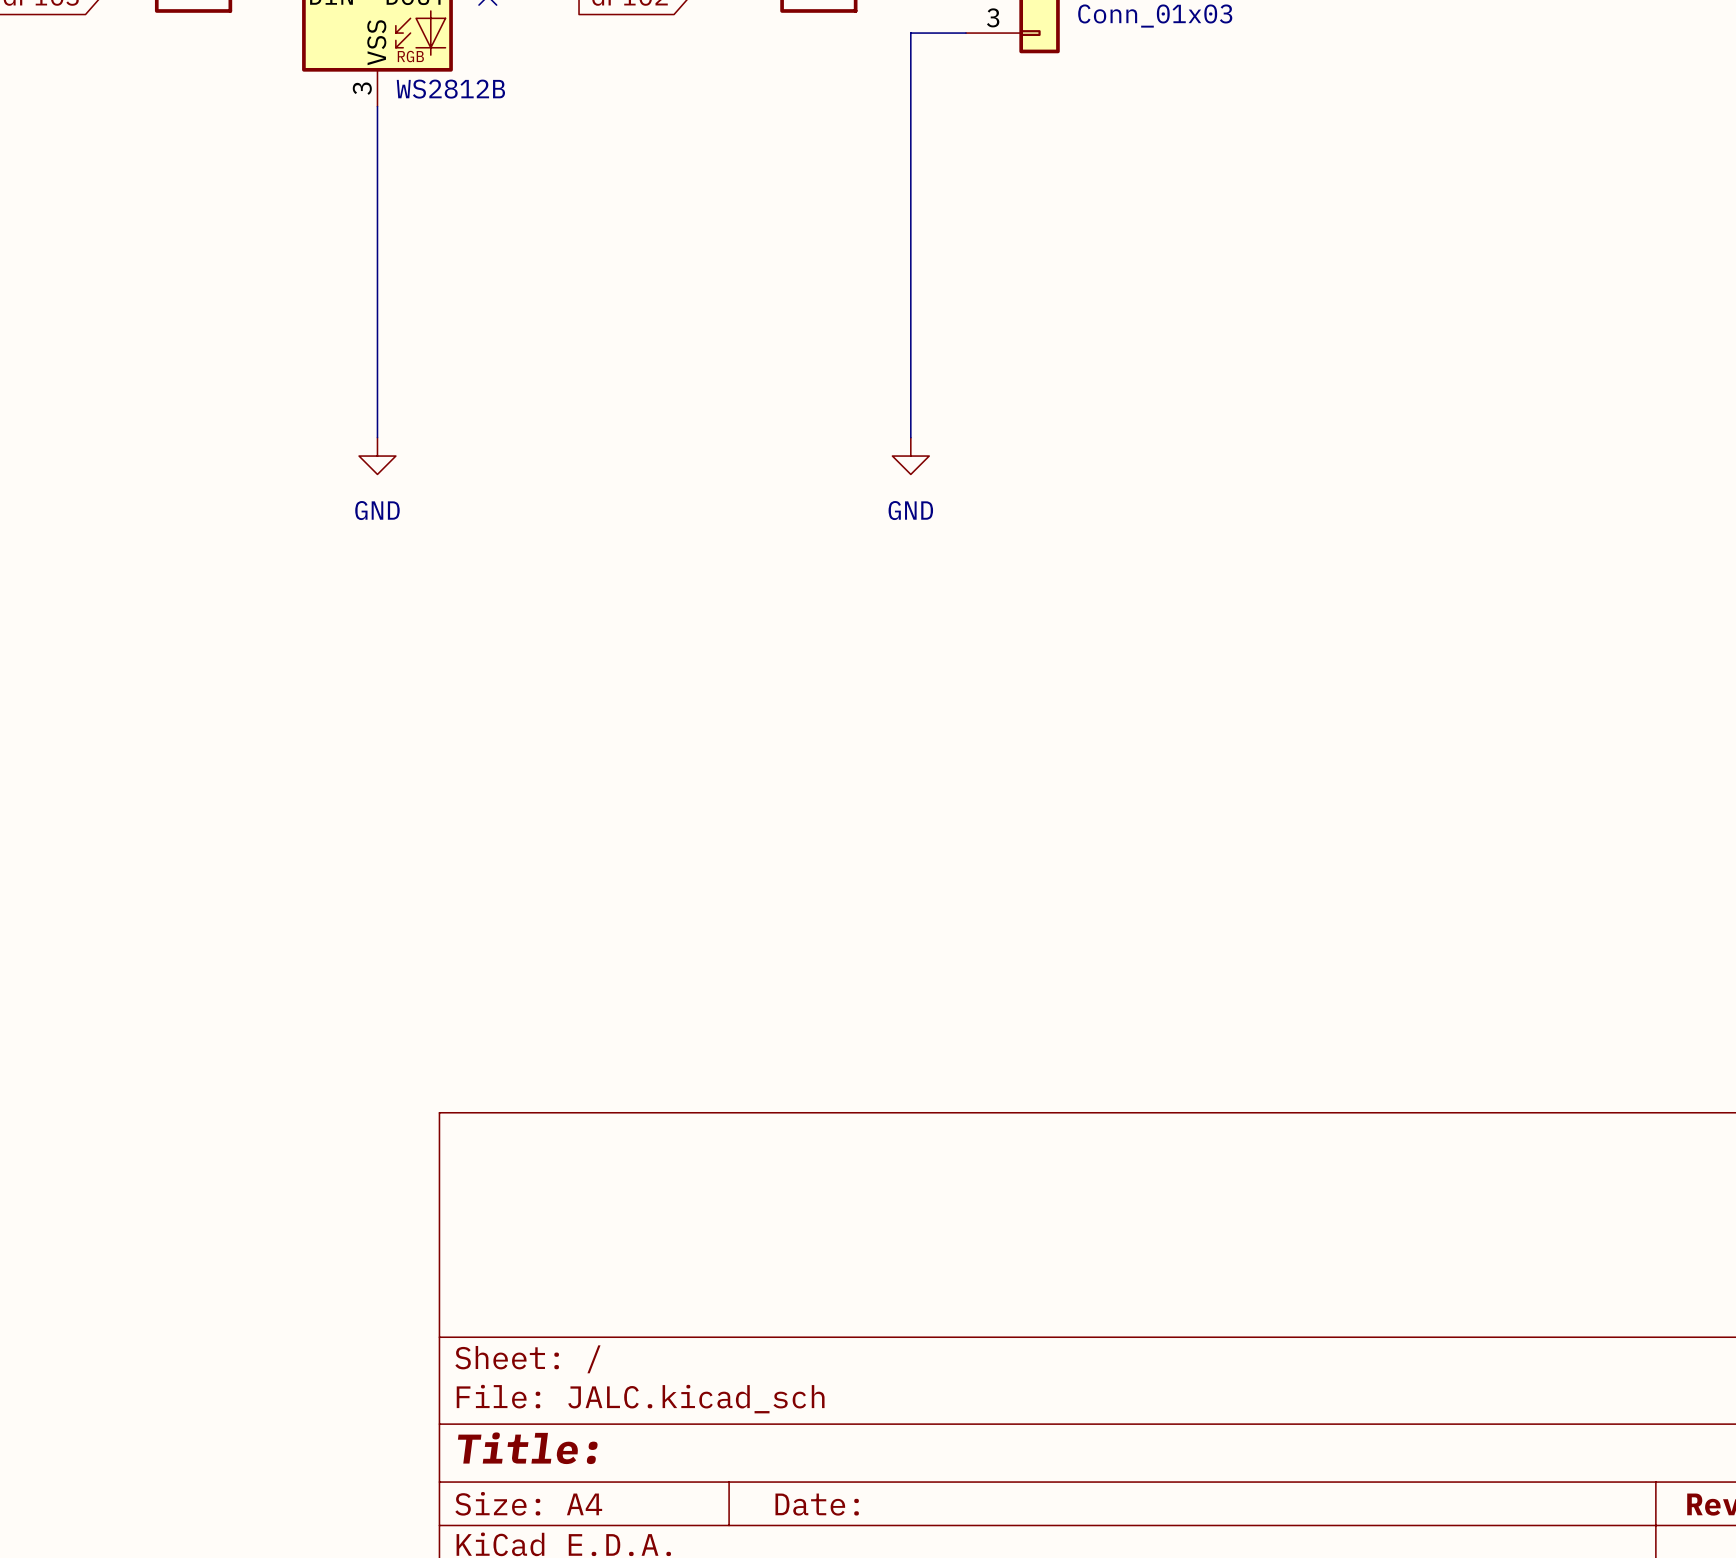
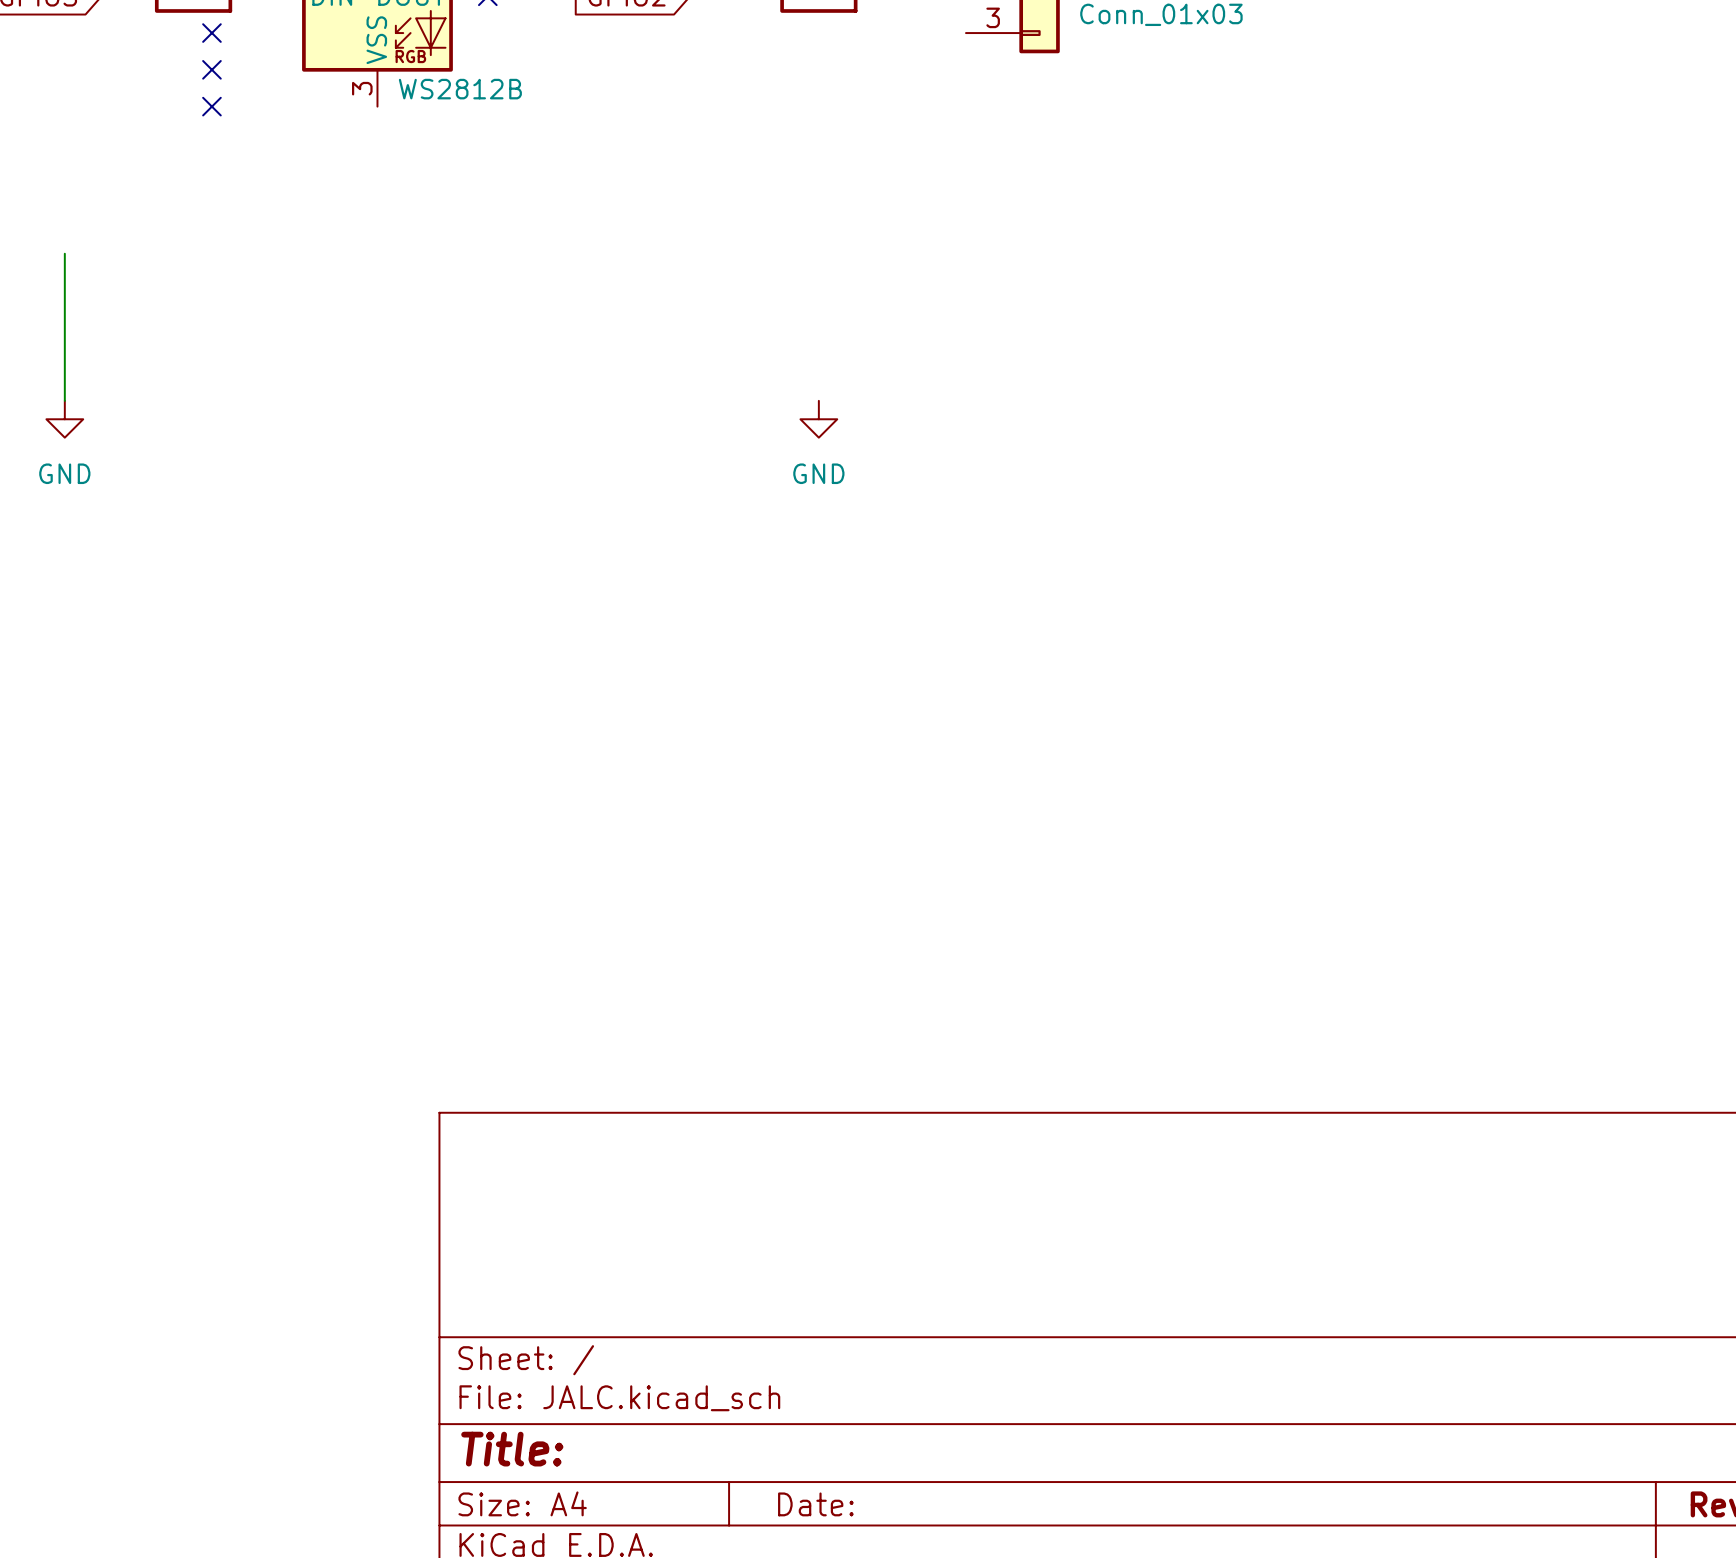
no-connect mark: none -> (211, 33)
wire: (965, 33) (910, 33) (910, 437) -> none
no-connect mark: none -> (211, 69)
no-connect mark: none -> (211, 106)
wire: (377, 106) (377, 437) -> none
wire: none -> (64, 253) (64, 400)
power symbol: none -> GND (64, 419)
power symbol: GND (377, 456) -> none
power symbol position: GND (910, 456) -> GND (818, 419)

